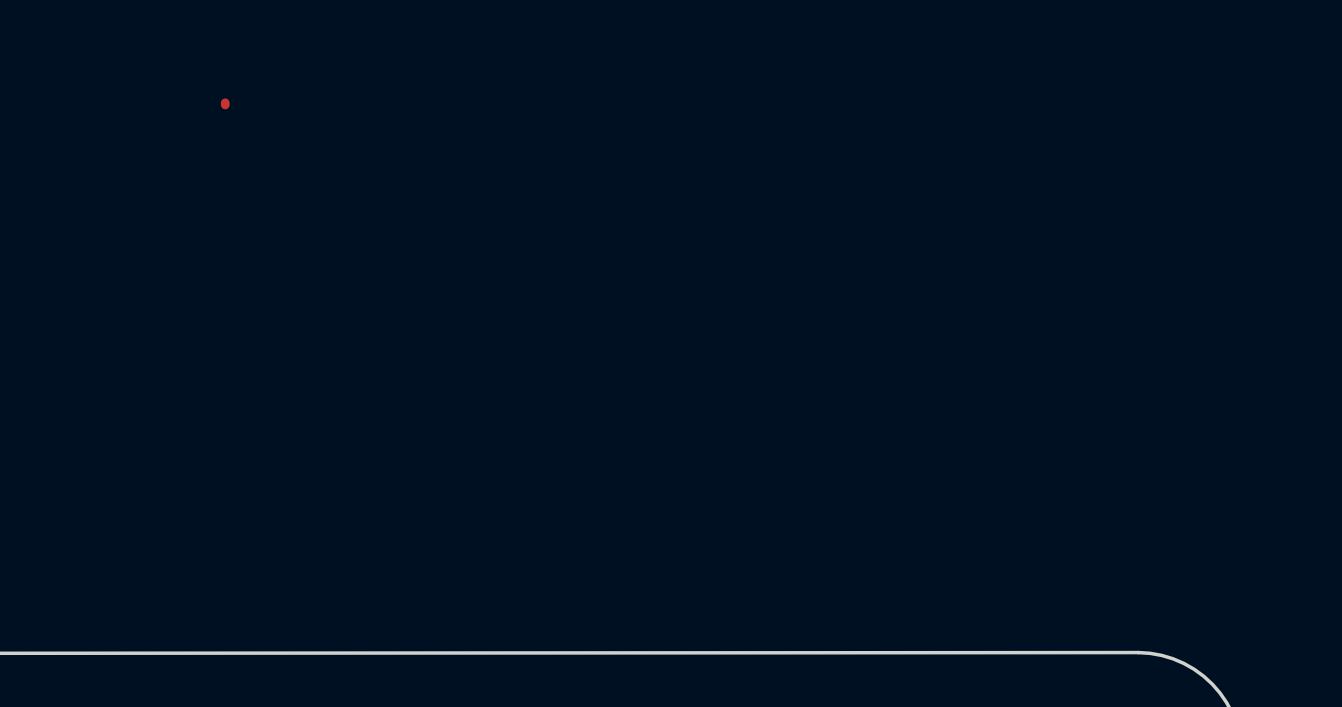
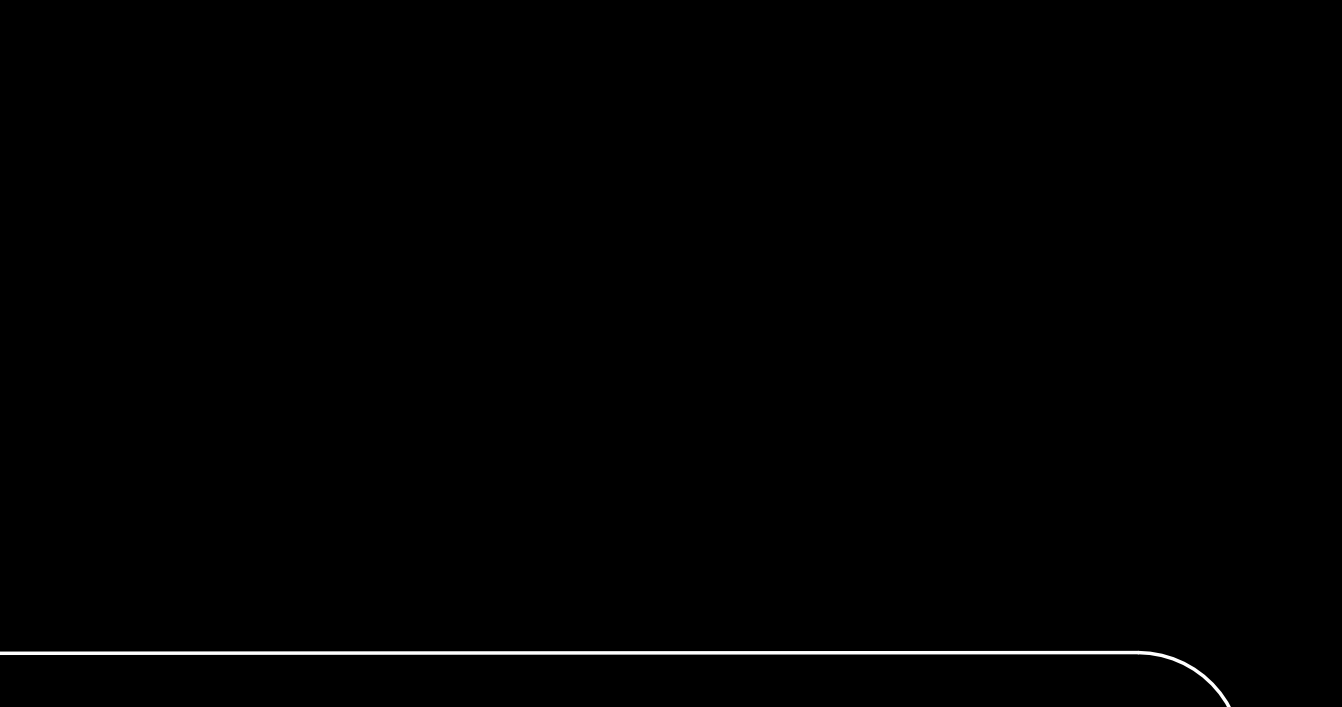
top track: (225, 102) (225, 104) -> none

